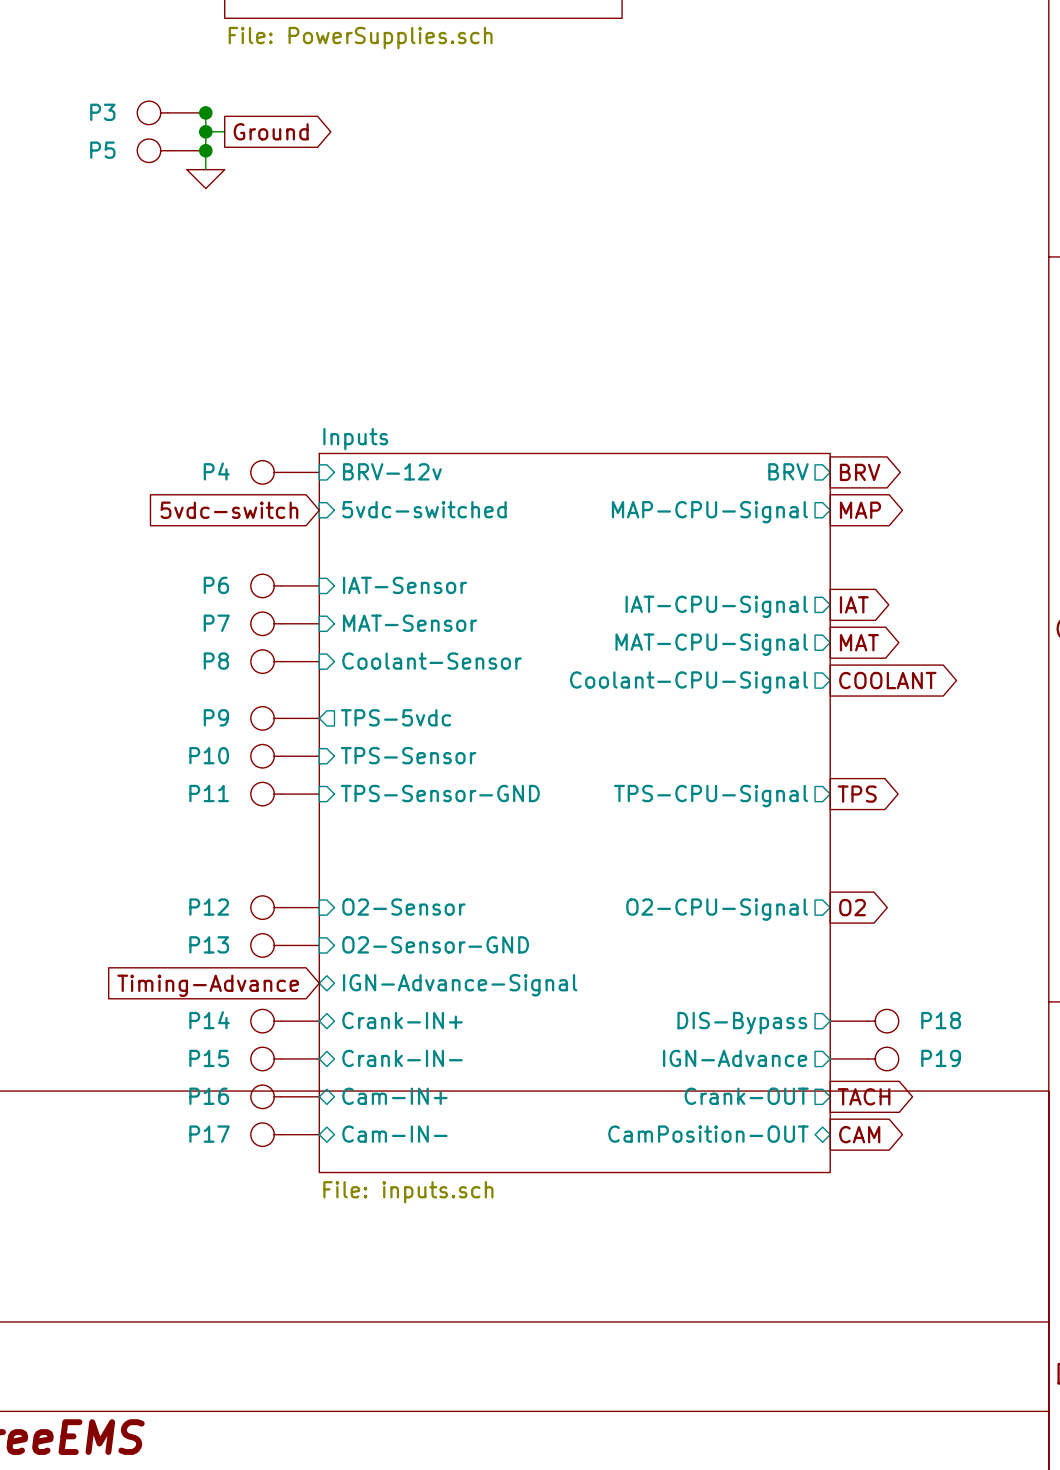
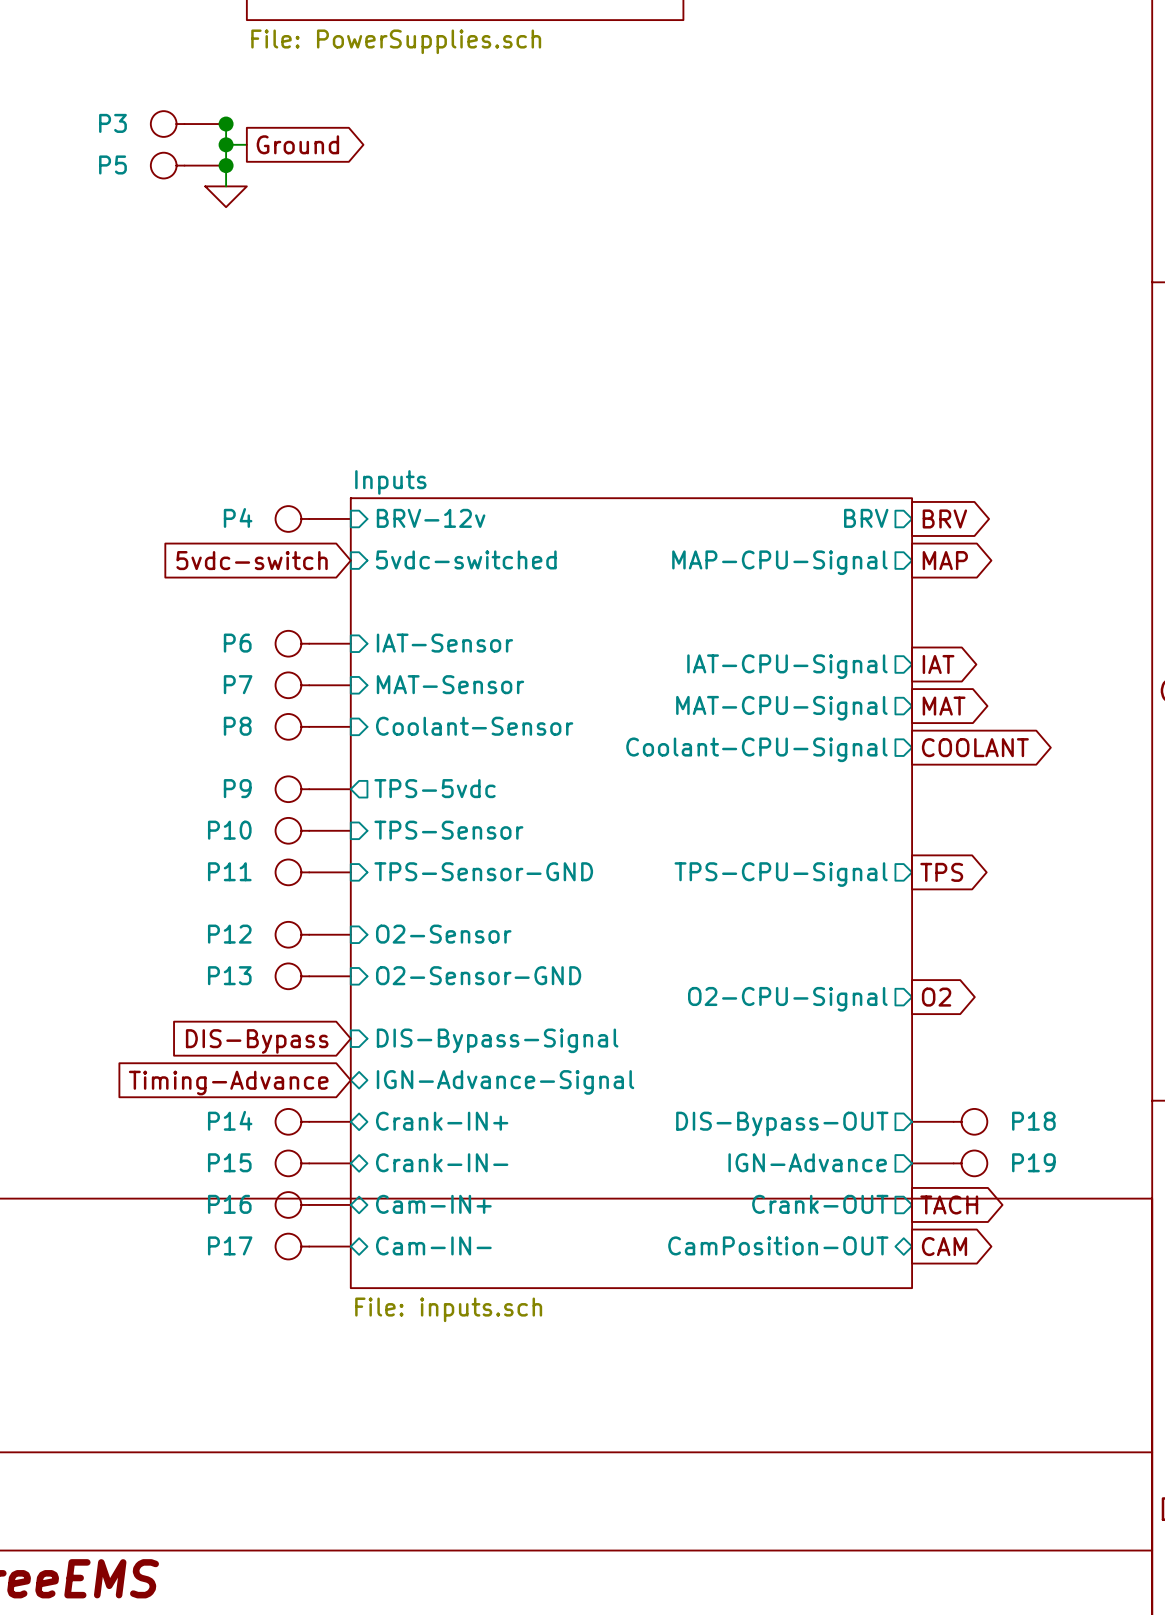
sheet pin: none -> O2-Sensor-GND (478, 975)
P12 position: (285, 907) -> (313, 934)
sheet pin position: O2-Sensor (403, 907) -> O2-Sensor (443, 934)
sheet pin: O2-Sensor-GND (435, 944) -> DIS-Bypass-Signal (497, 1040)
P13 position: (285, 945) -> (313, 976)
global label: none -> DIS-Bypass (257, 1041)
sheet pin: DIS-Bypass (742, 1023) -> DIS-Bypass-OUT (782, 1123)

